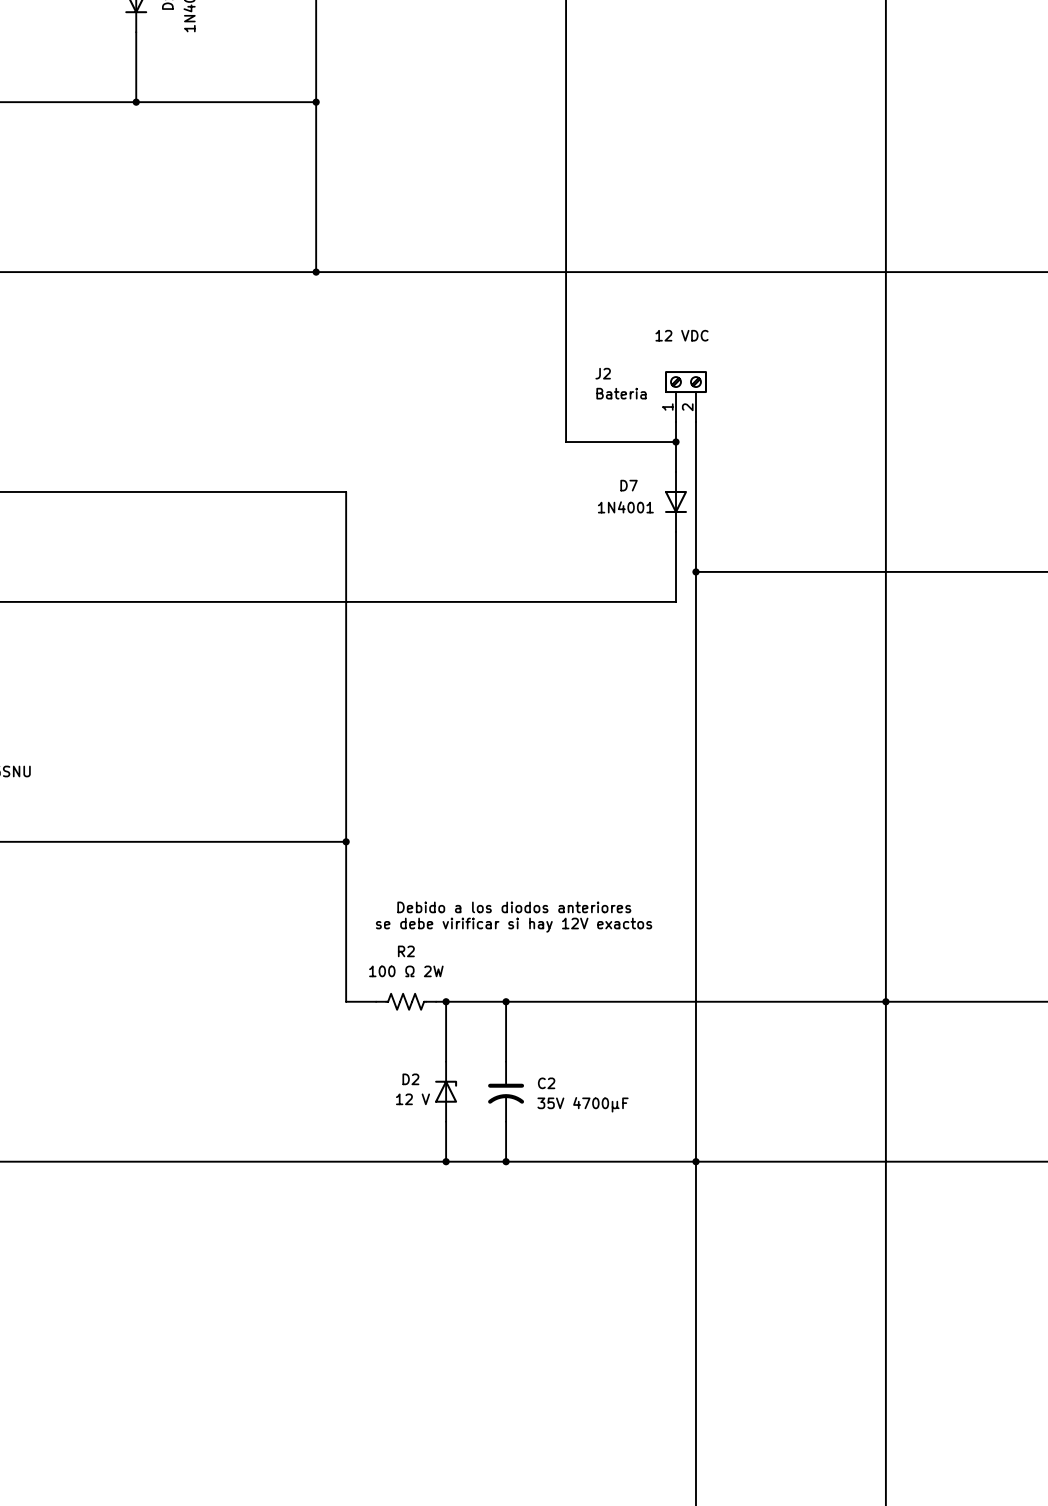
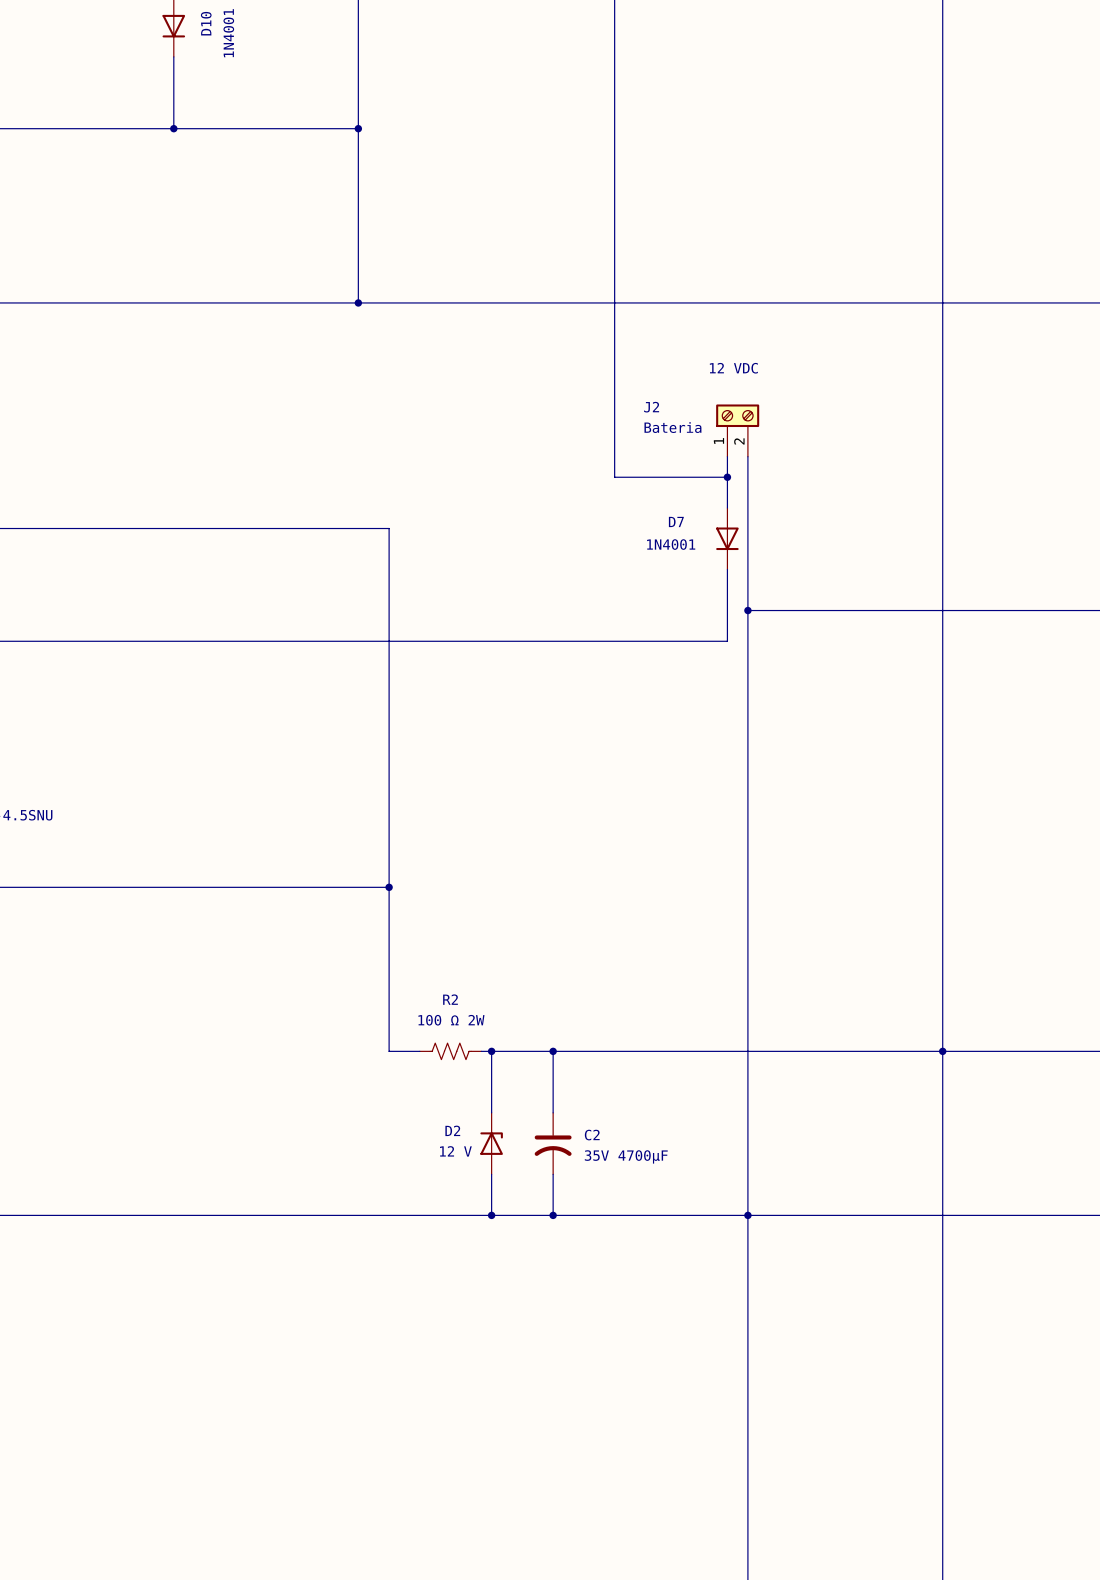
text: Debido a los diodos anteriores (514, 907) -> none
text: se debe virificar si hay 12V exactos (514, 925) -> none

